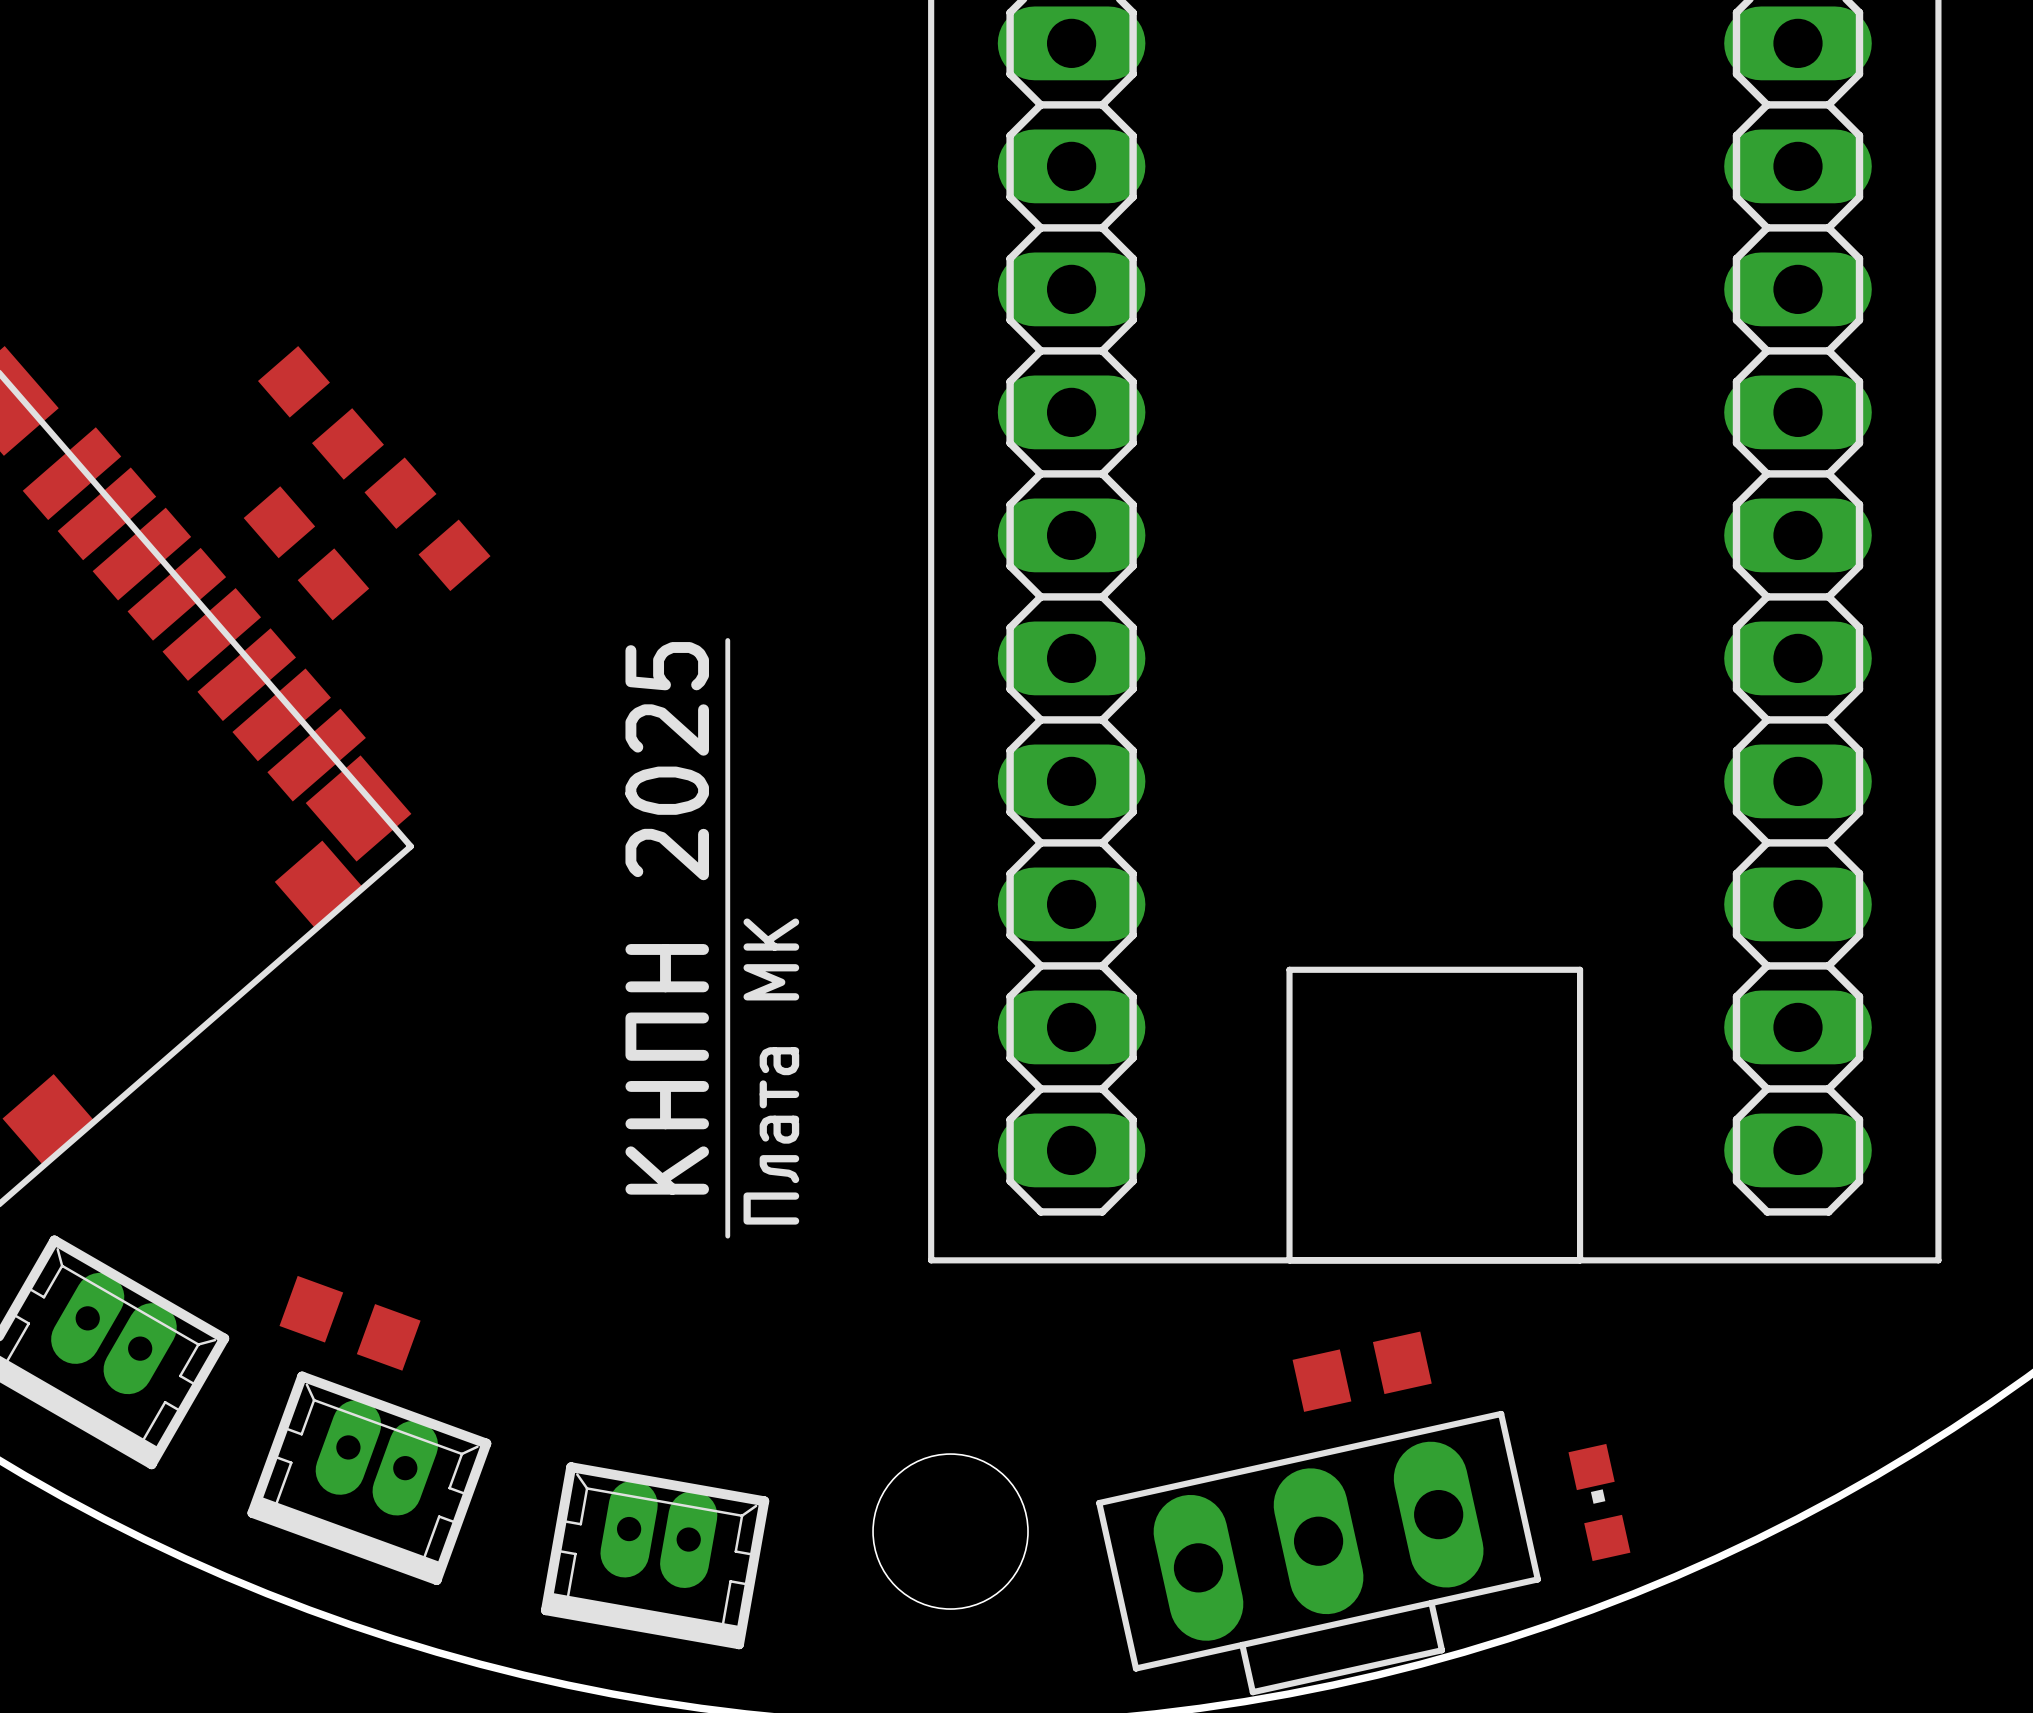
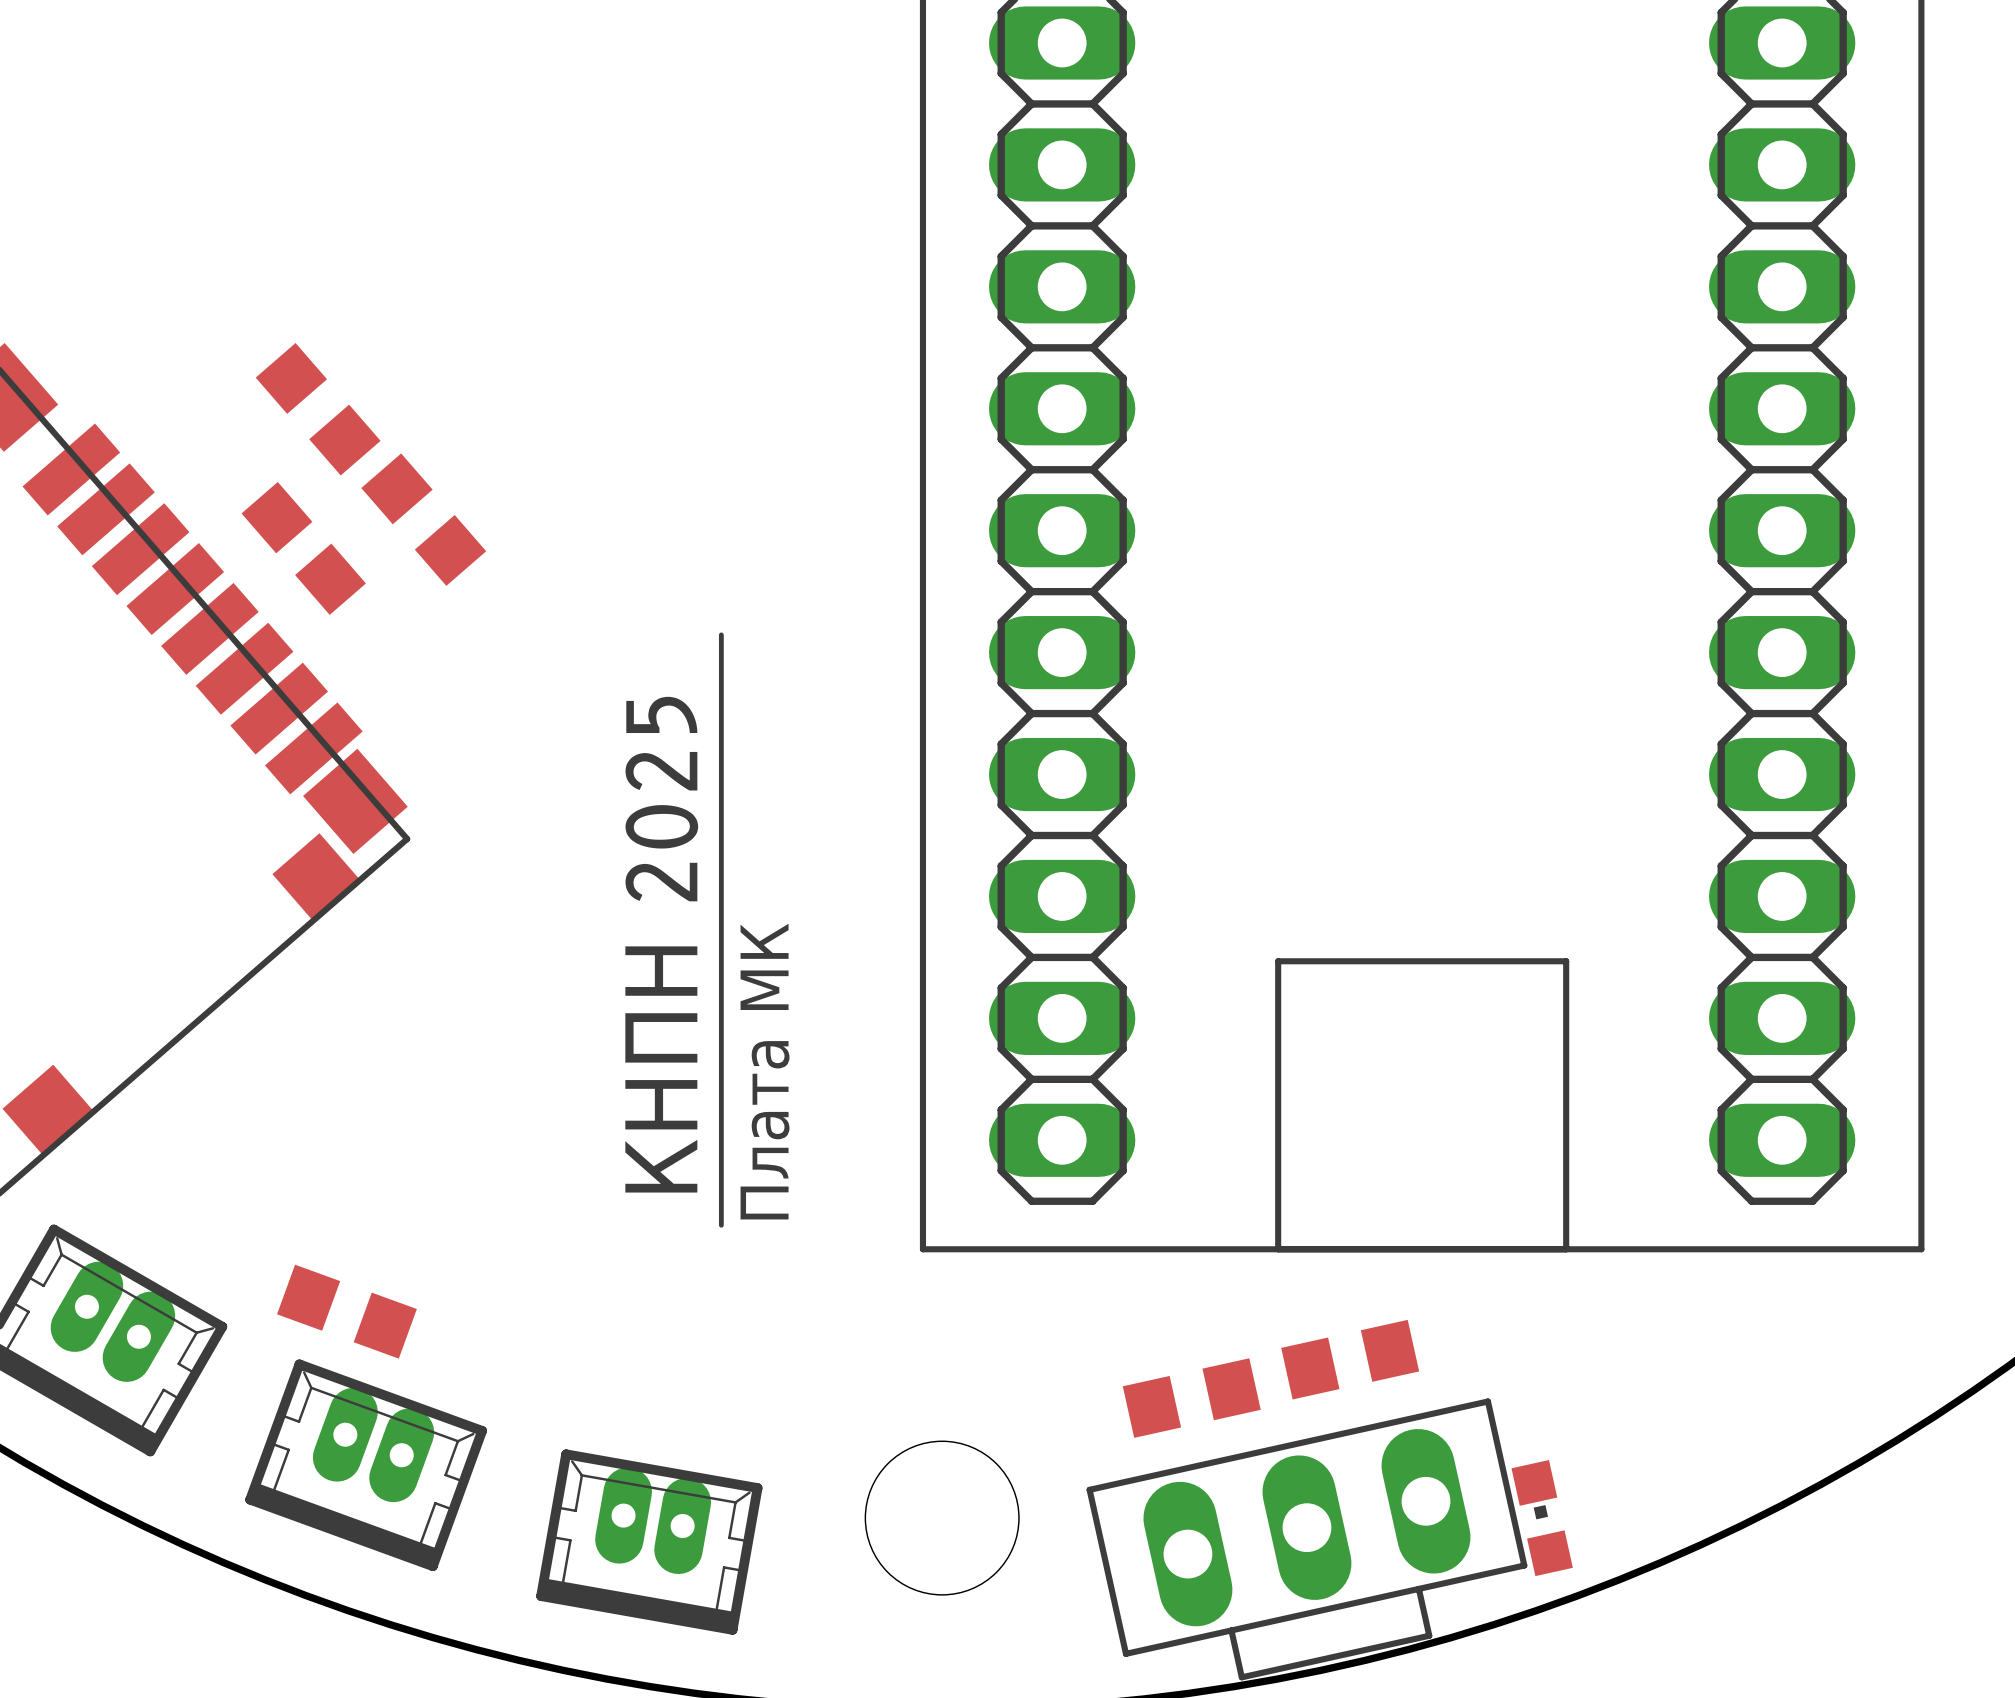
part: none -> (1191, 1398)
part position: (1599, 1502) -> (1542, 1518)

